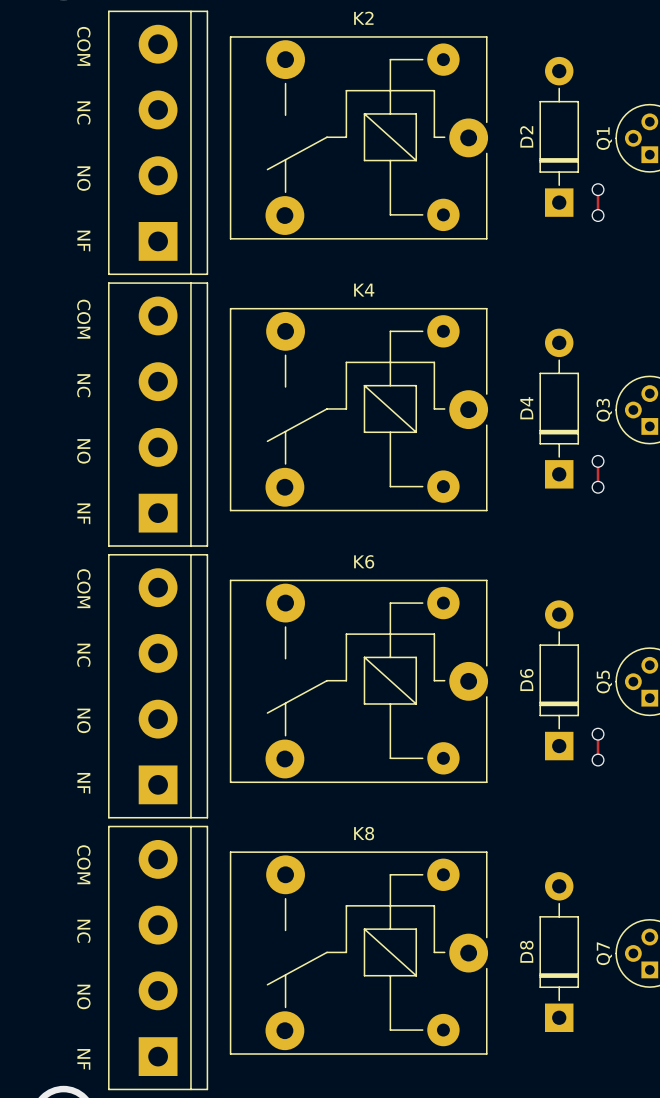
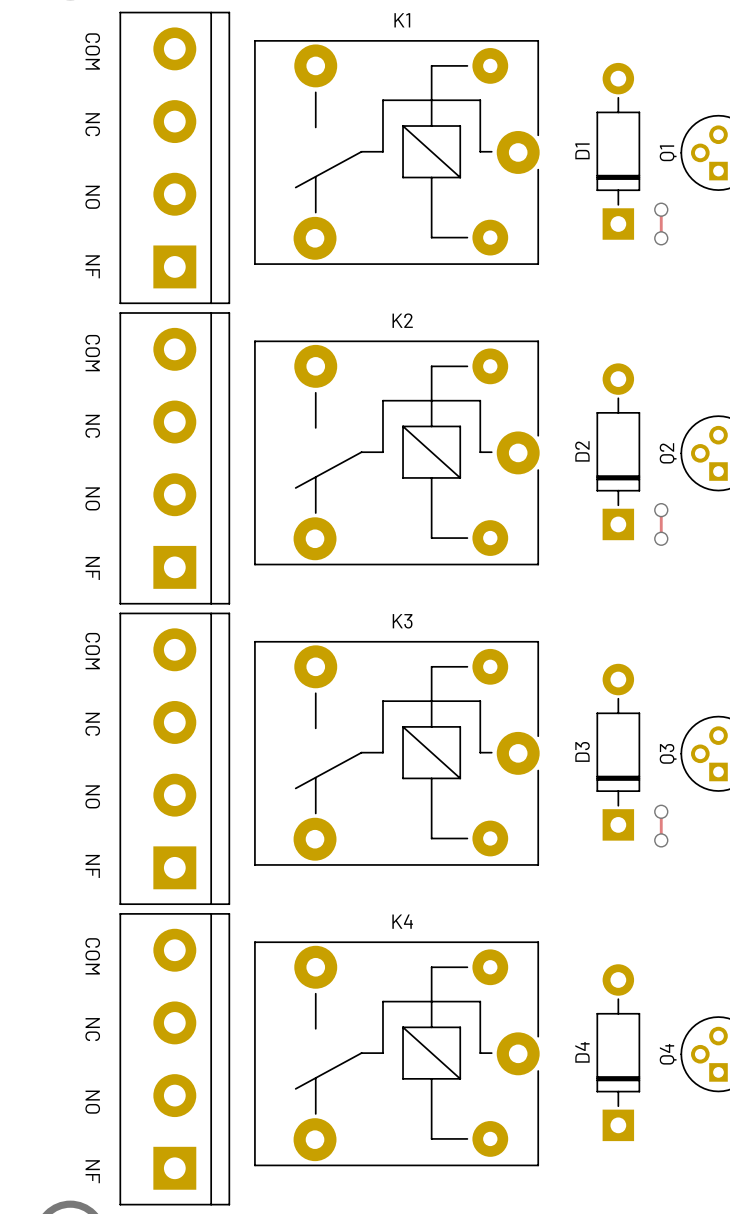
K2 name: K2 (363, 18) -> K1 (402, 20)
D2 name: D2 (526, 136) -> D1 (582, 151)
K4 name: K4 (364, 290) -> K2 (402, 320)
D4 name: D4 (526, 408) -> D2 (582, 451)
Q3 name: Q3 (604, 410) -> Q2 (668, 453)
K6 name: K6 (364, 561) -> K3 (402, 621)
D6 name: D6 (526, 680) -> D3 (582, 751)
Q5 name: Q5 (604, 682) -> Q3 (668, 753)
K8 name: K8 (364, 833) -> K4 (402, 921)
D8 name: D8 (526, 951) -> D4 (582, 1052)
Q7 name: Q7 (604, 953) -> Q4 (668, 1054)

